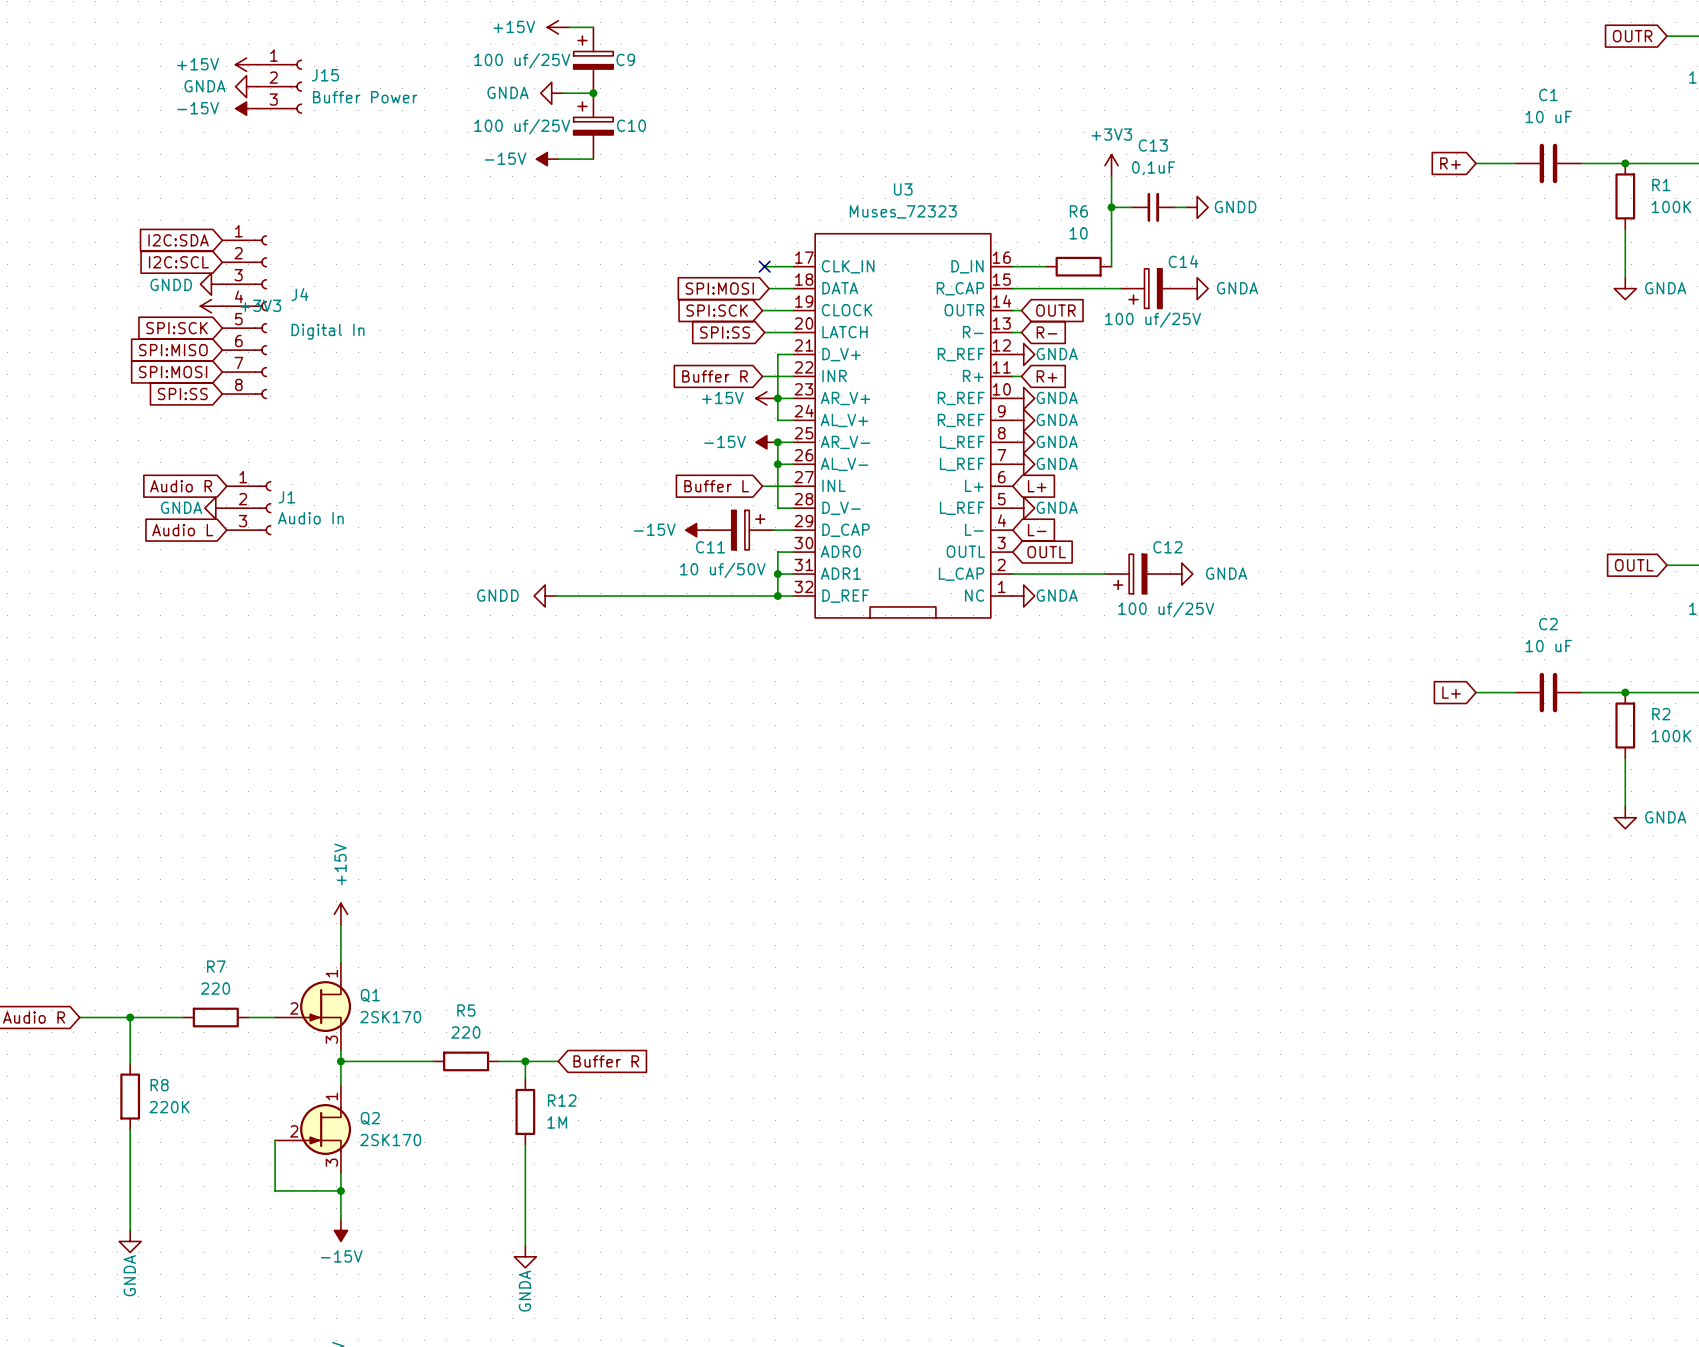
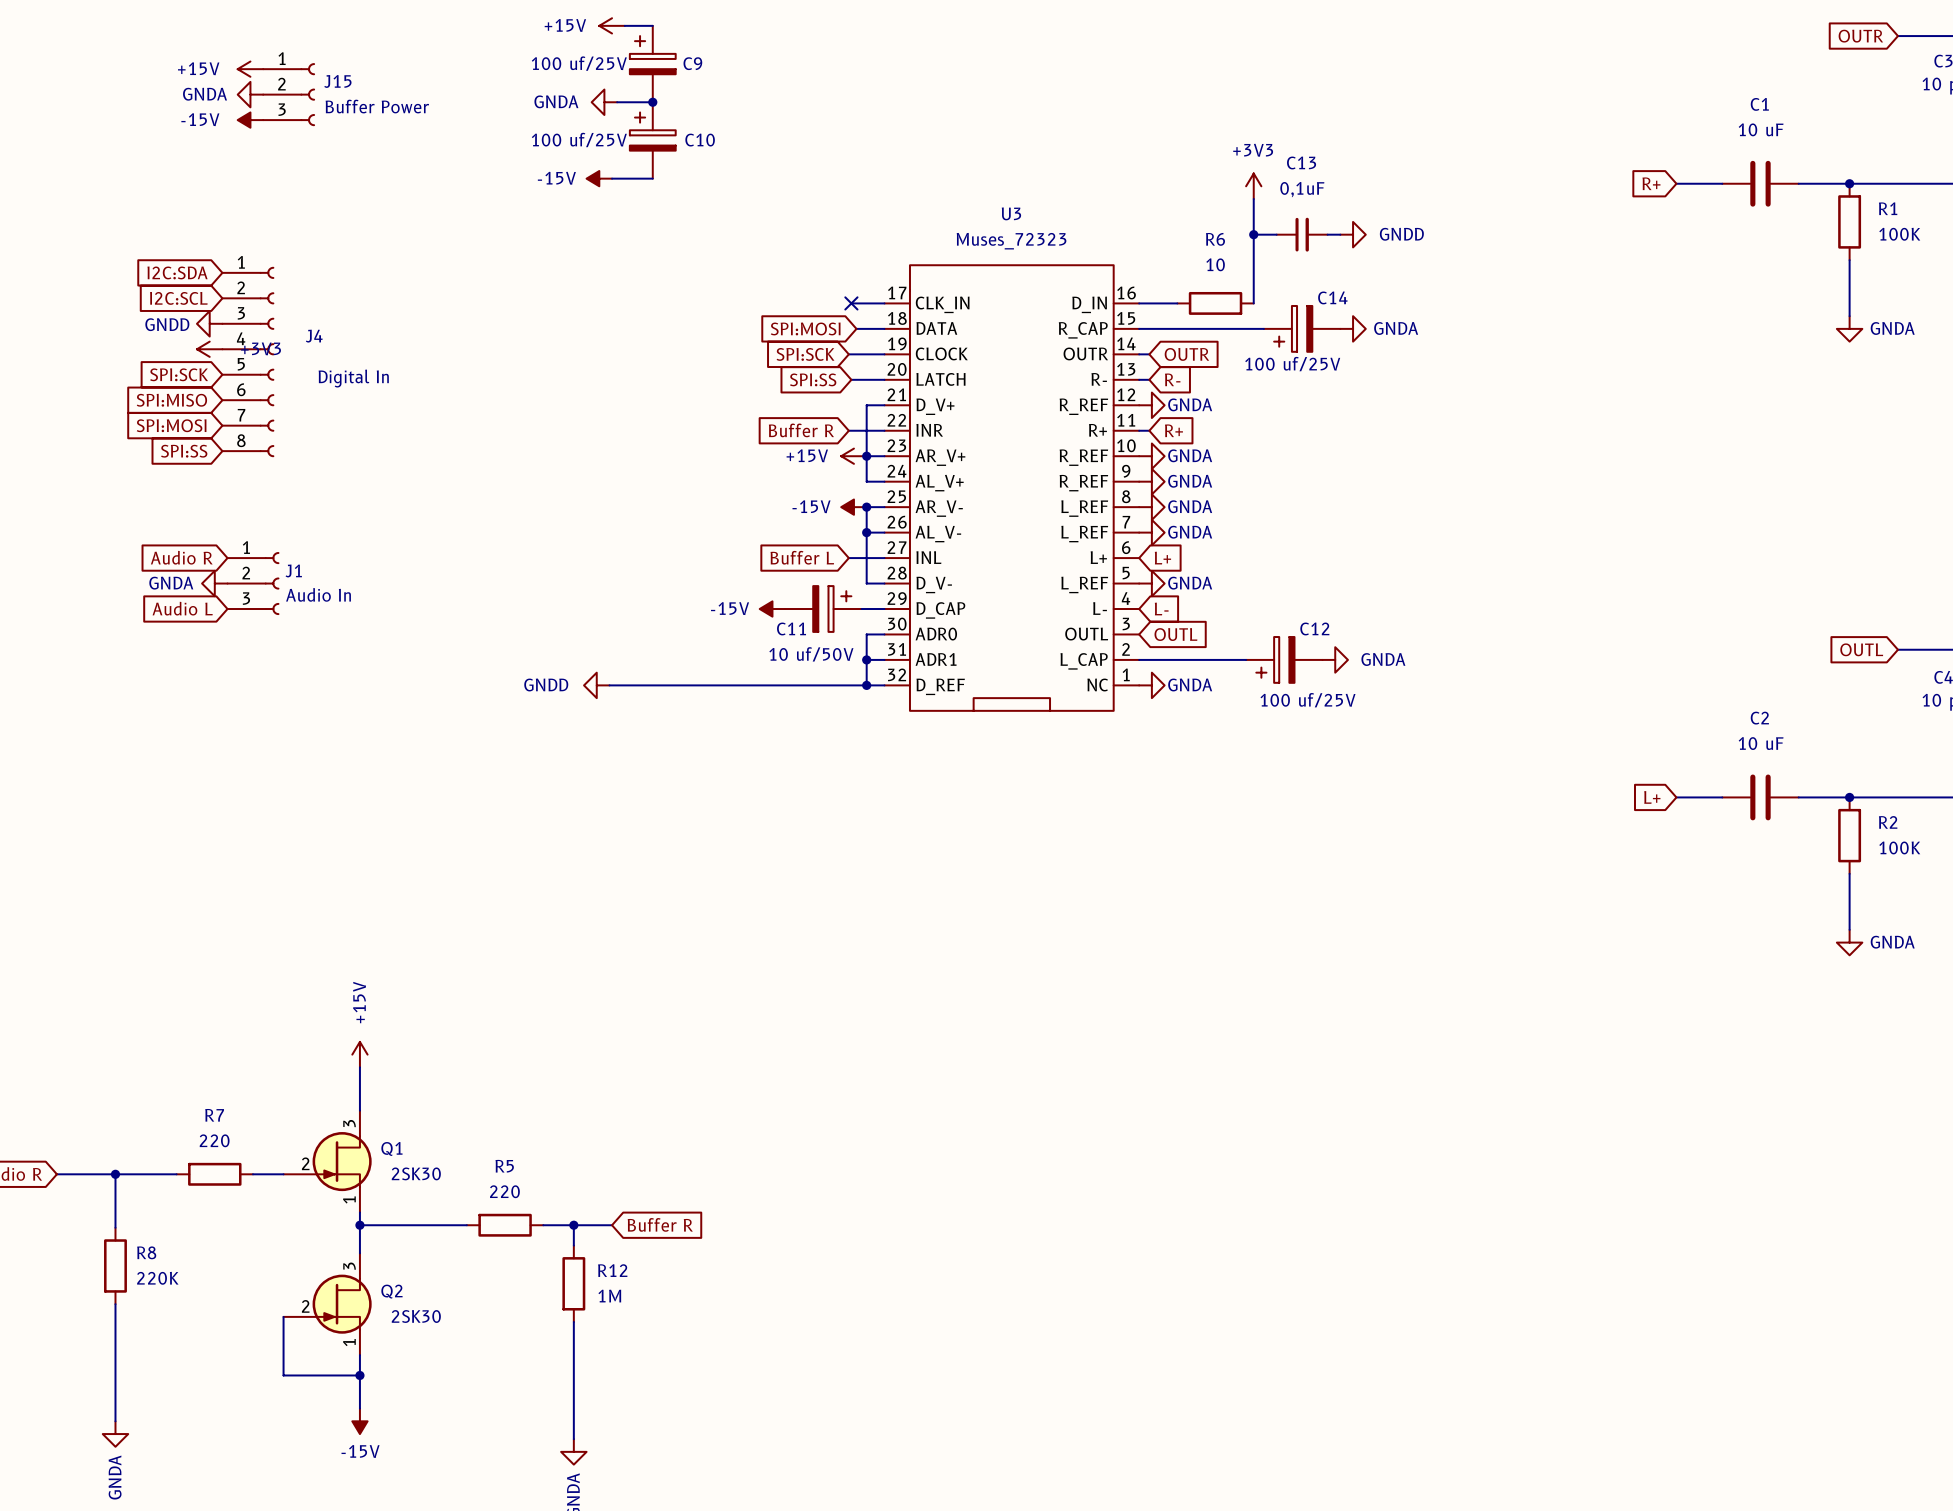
Q1 pin number: 1 (331, 973) -> 3 (349, 1123)
Q1 value: 2SK170 (390, 1017) -> 2SK30 (416, 1173)
Q1 pin number: 3 (331, 1039) -> 1 (349, 1199)
Q2 pin number: 1 (331, 1096) -> 3 (349, 1266)
Q2 value: 2SK170 (390, 1140) -> 2SK30 (416, 1316)
Q2 pin number: 3 (331, 1162) -> 1 (349, 1342)

